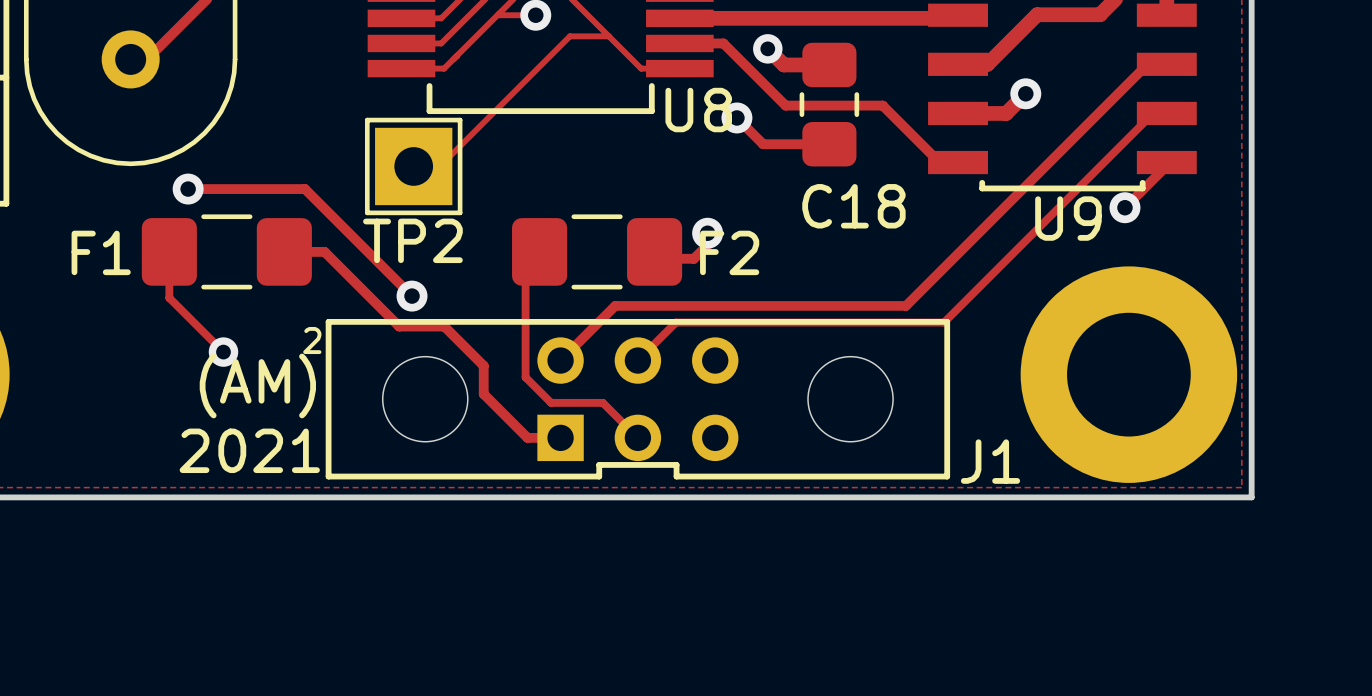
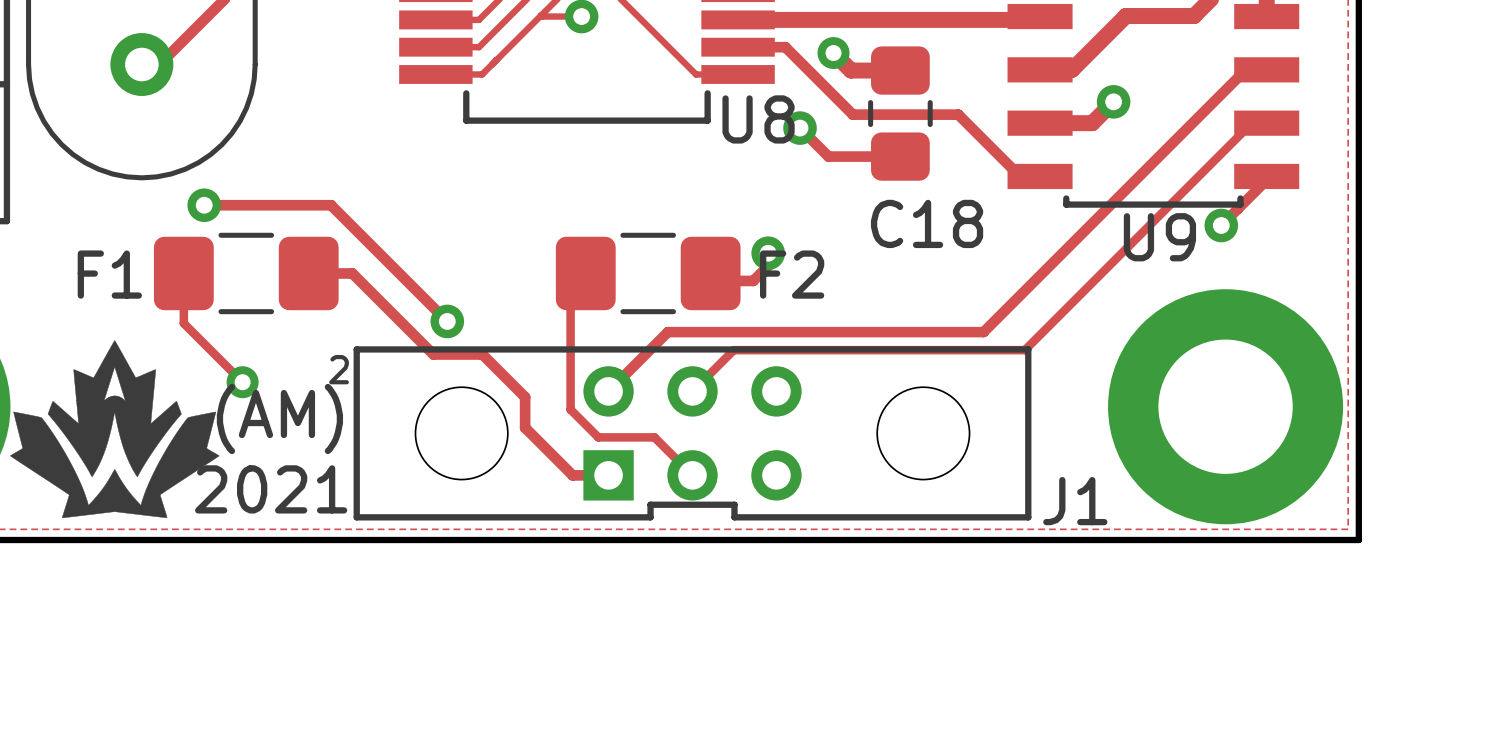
track: (608, 36) (569, 36) (413, 191) -> none
TP2: (413, 166) -> none
drawing: none -> [10, 340, 220, 519]

